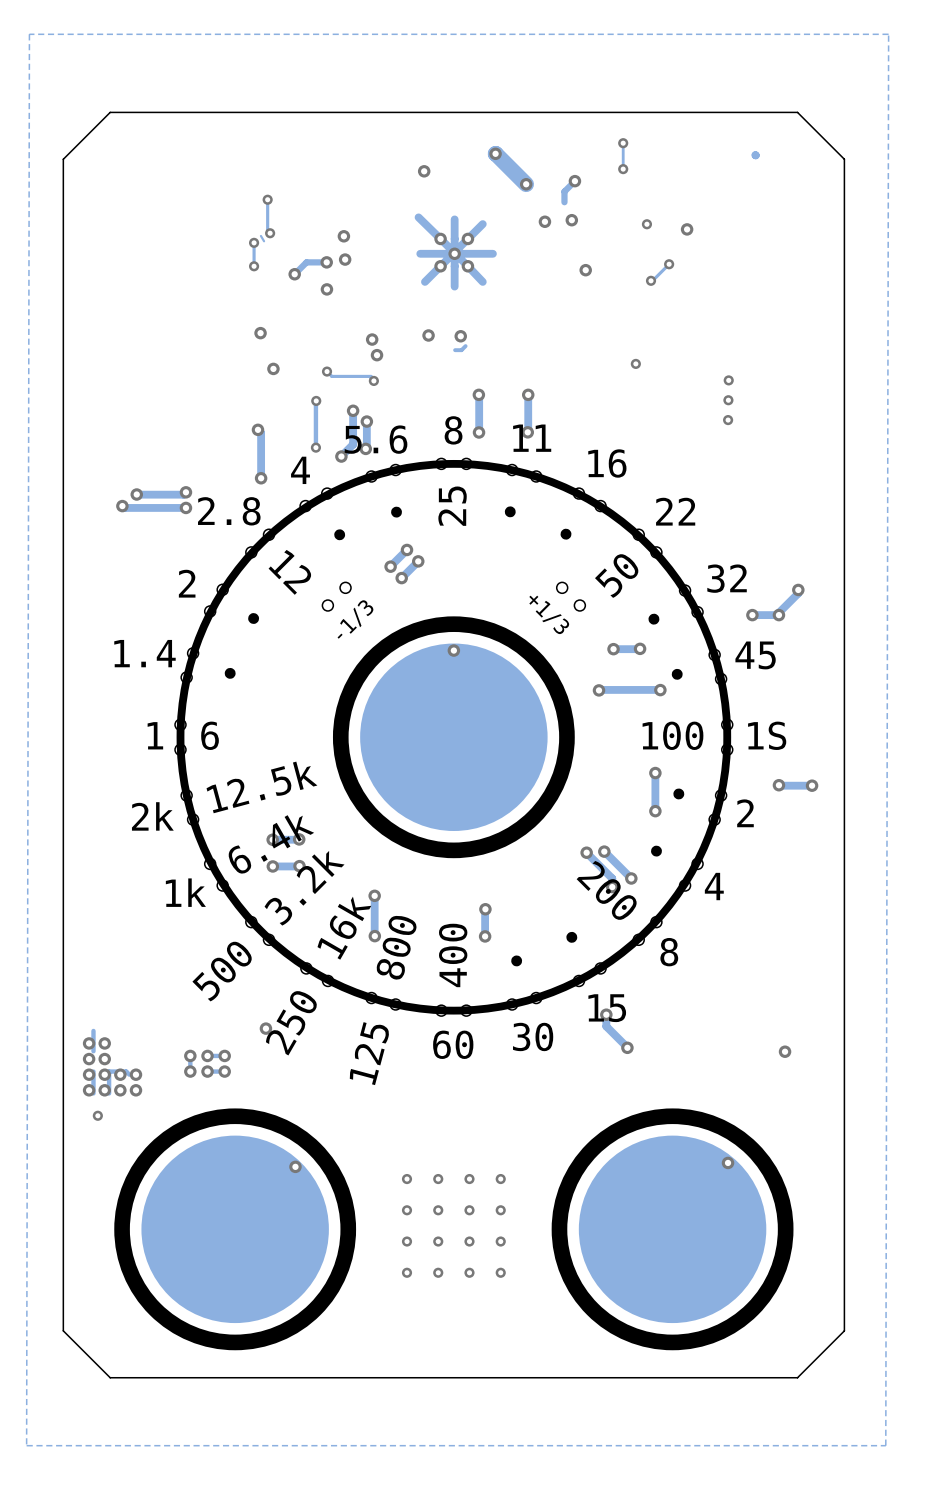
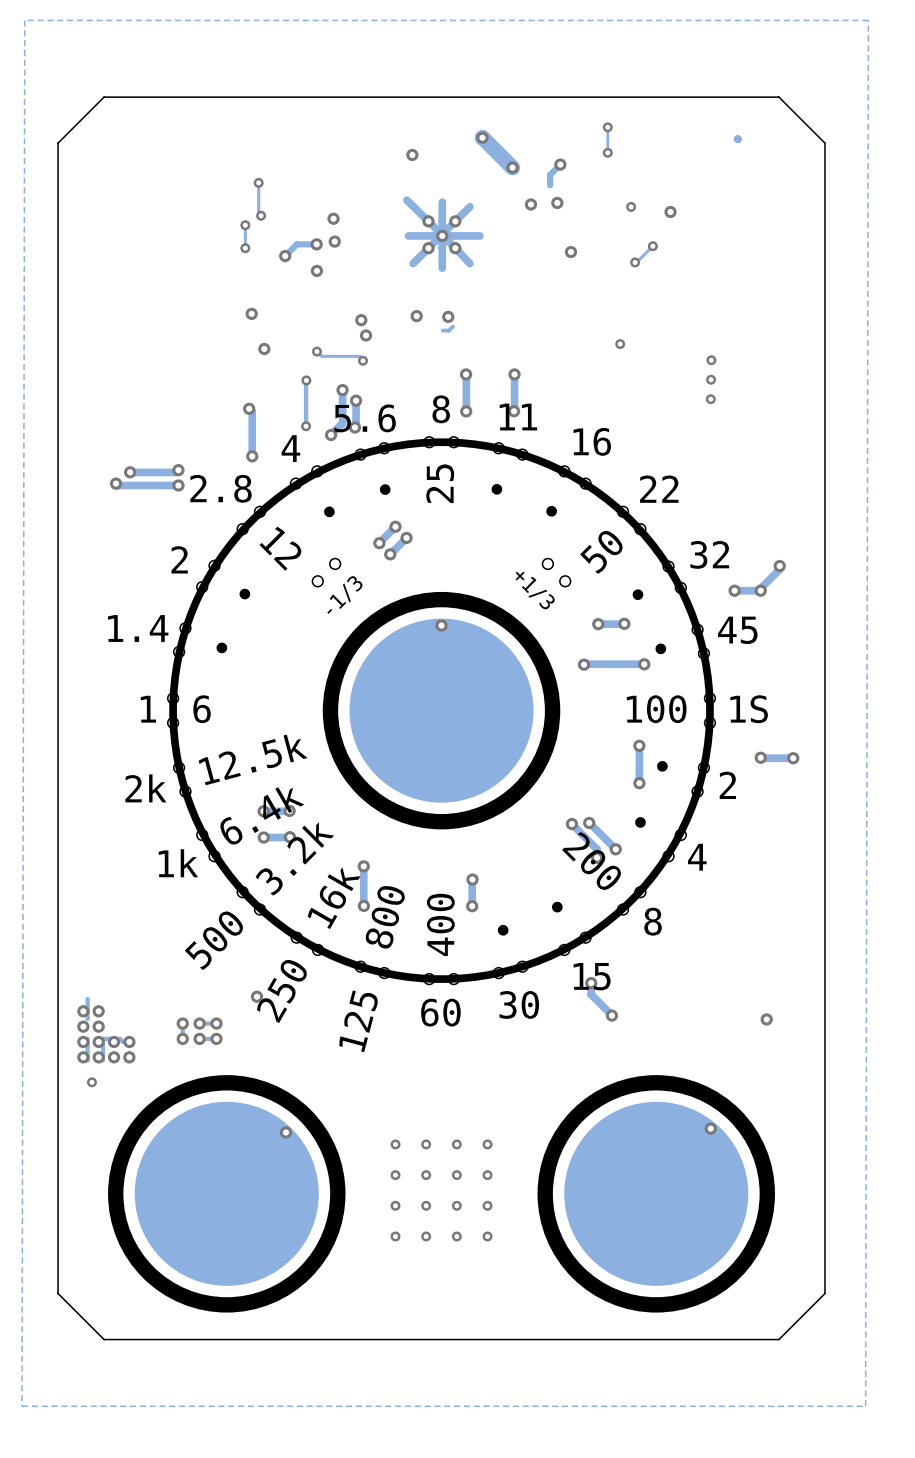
track: (260, 235) (264, 241) -> none

